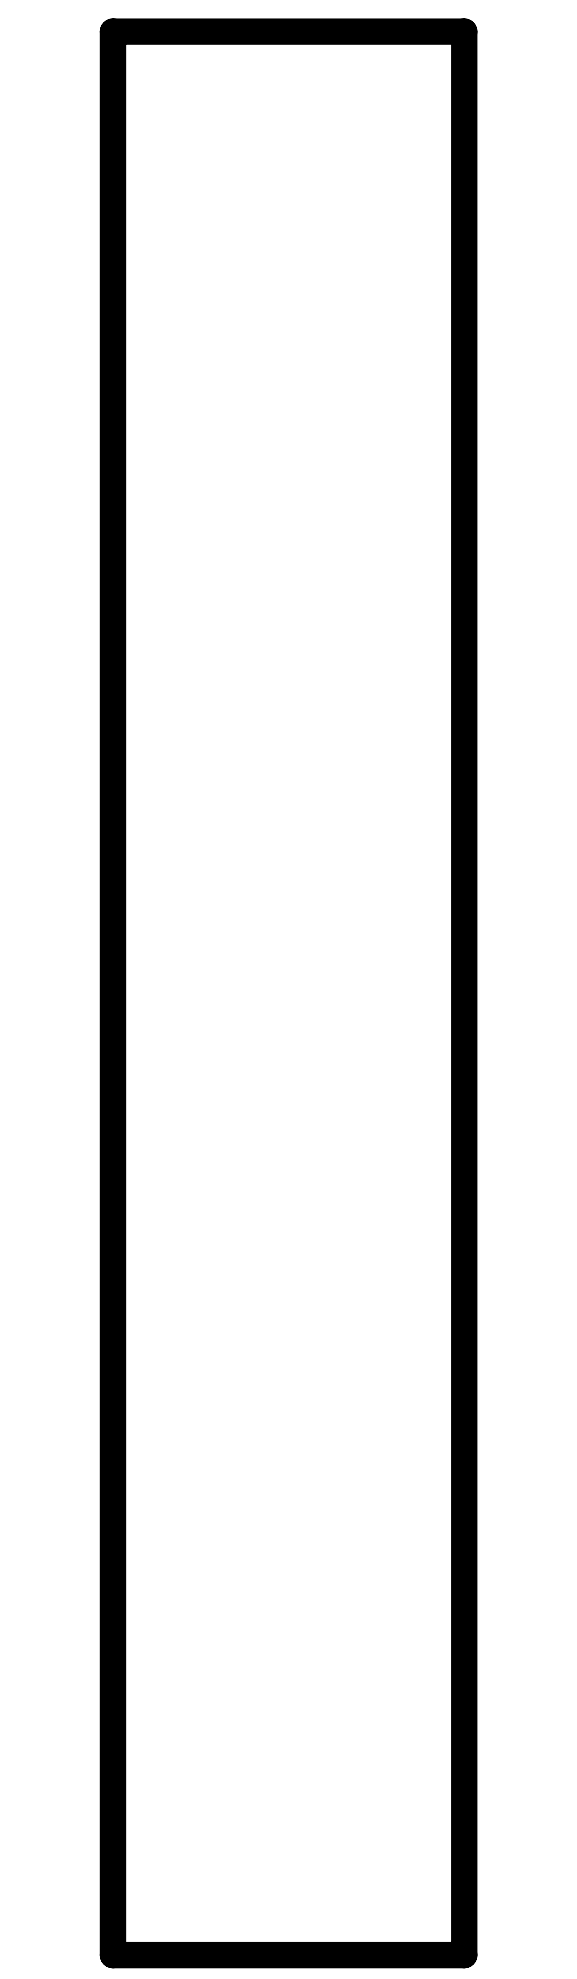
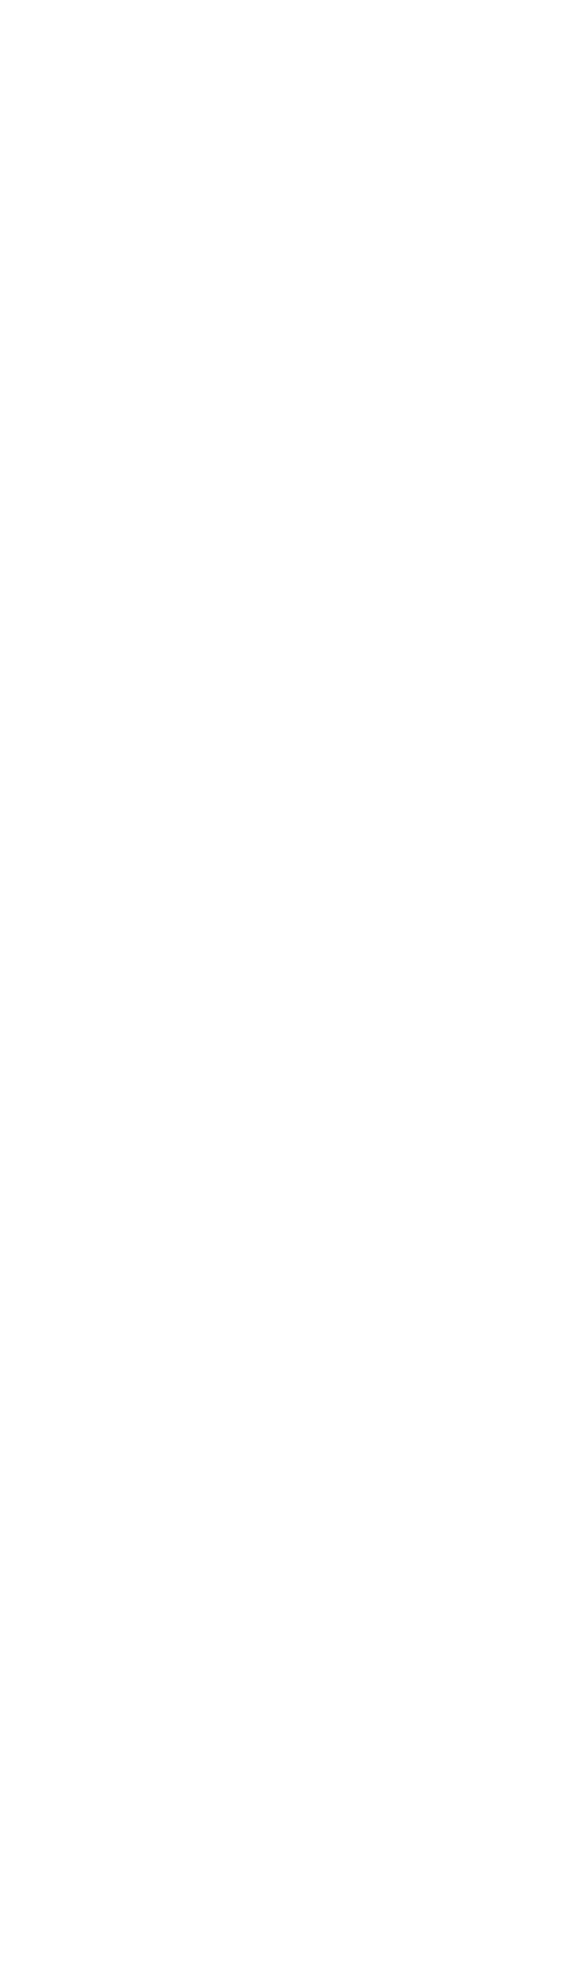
line: (112, 31) (464, 31) (464, 1955) (112, 1955) (112, 31) -> none

